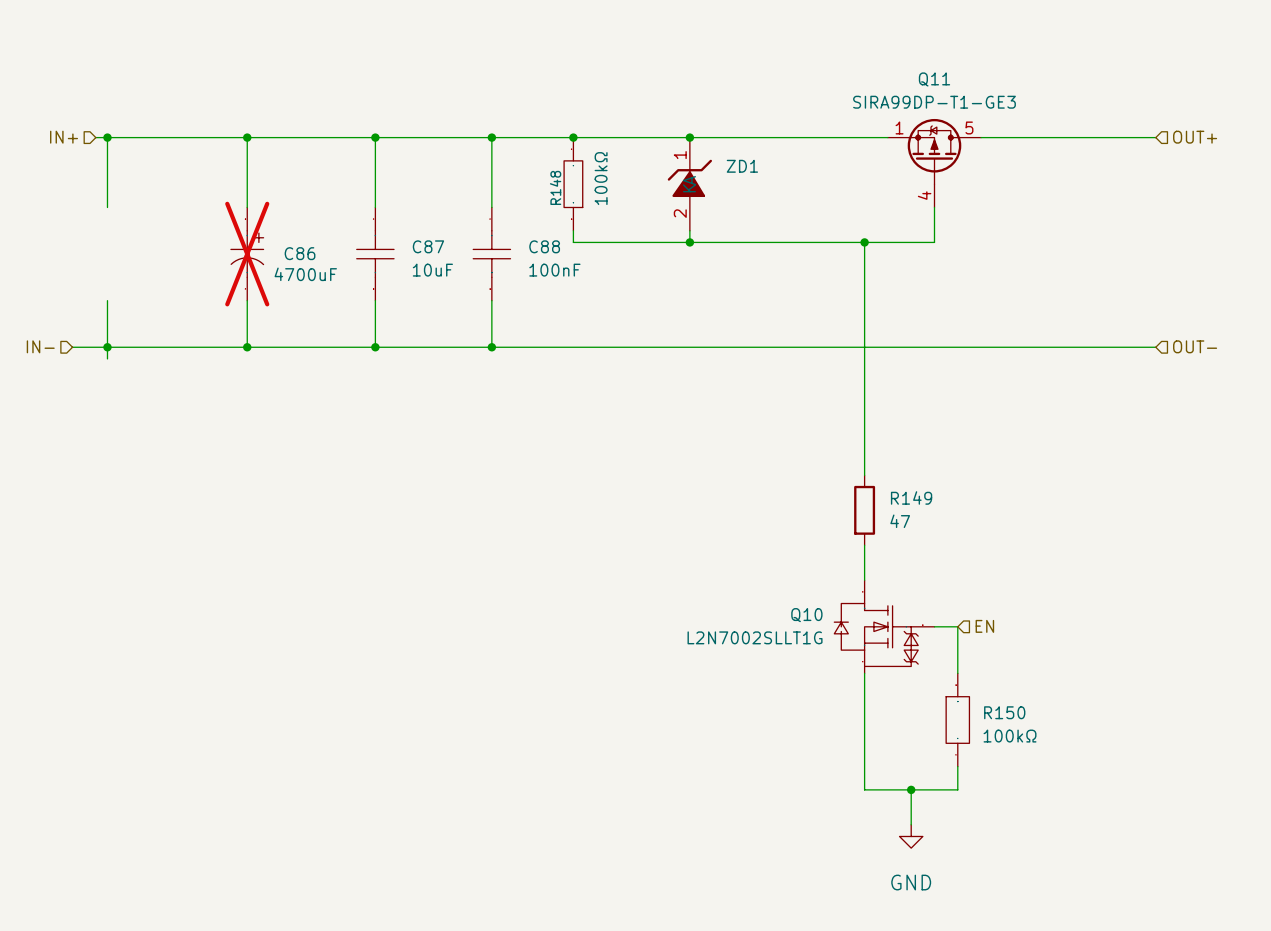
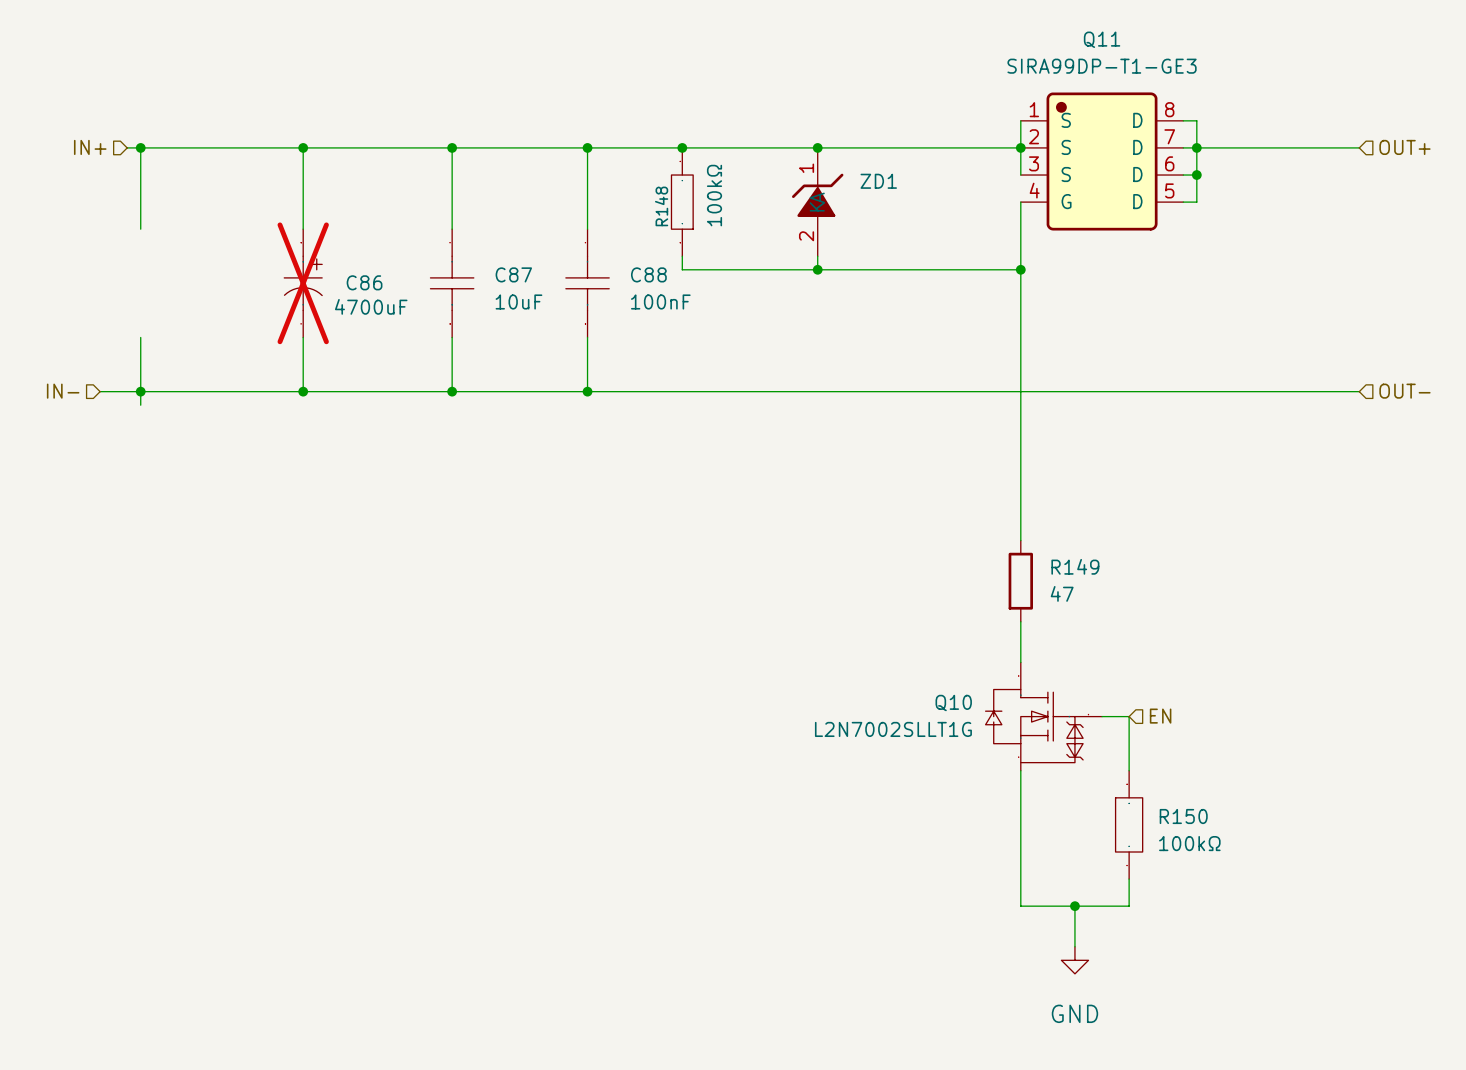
Q11 name position: Q11 (934, 79) -> Q11 (1102, 39)
Q11 value position: SIRA99DP-T1-GE3 (934, 102) -> SIRA99DP-T1-GE3 (1102, 66)
wire: none -> (1020, 120) (1020, 175)
wire: none -> (1183, 120) (1196, 120) (1196, 202) (1183, 202)
Q11 symbol: [887, 118, 982, 208] -> [1020, 92, 1184, 231]
junction: none -> (1020, 147)
junction: none -> (1196, 147)
wire: none -> (1183, 175) (1196, 175)
junction: none -> (1196, 175)
wire: (934, 207) (934, 242) (864, 242) -> (1020, 202) (1020, 269)

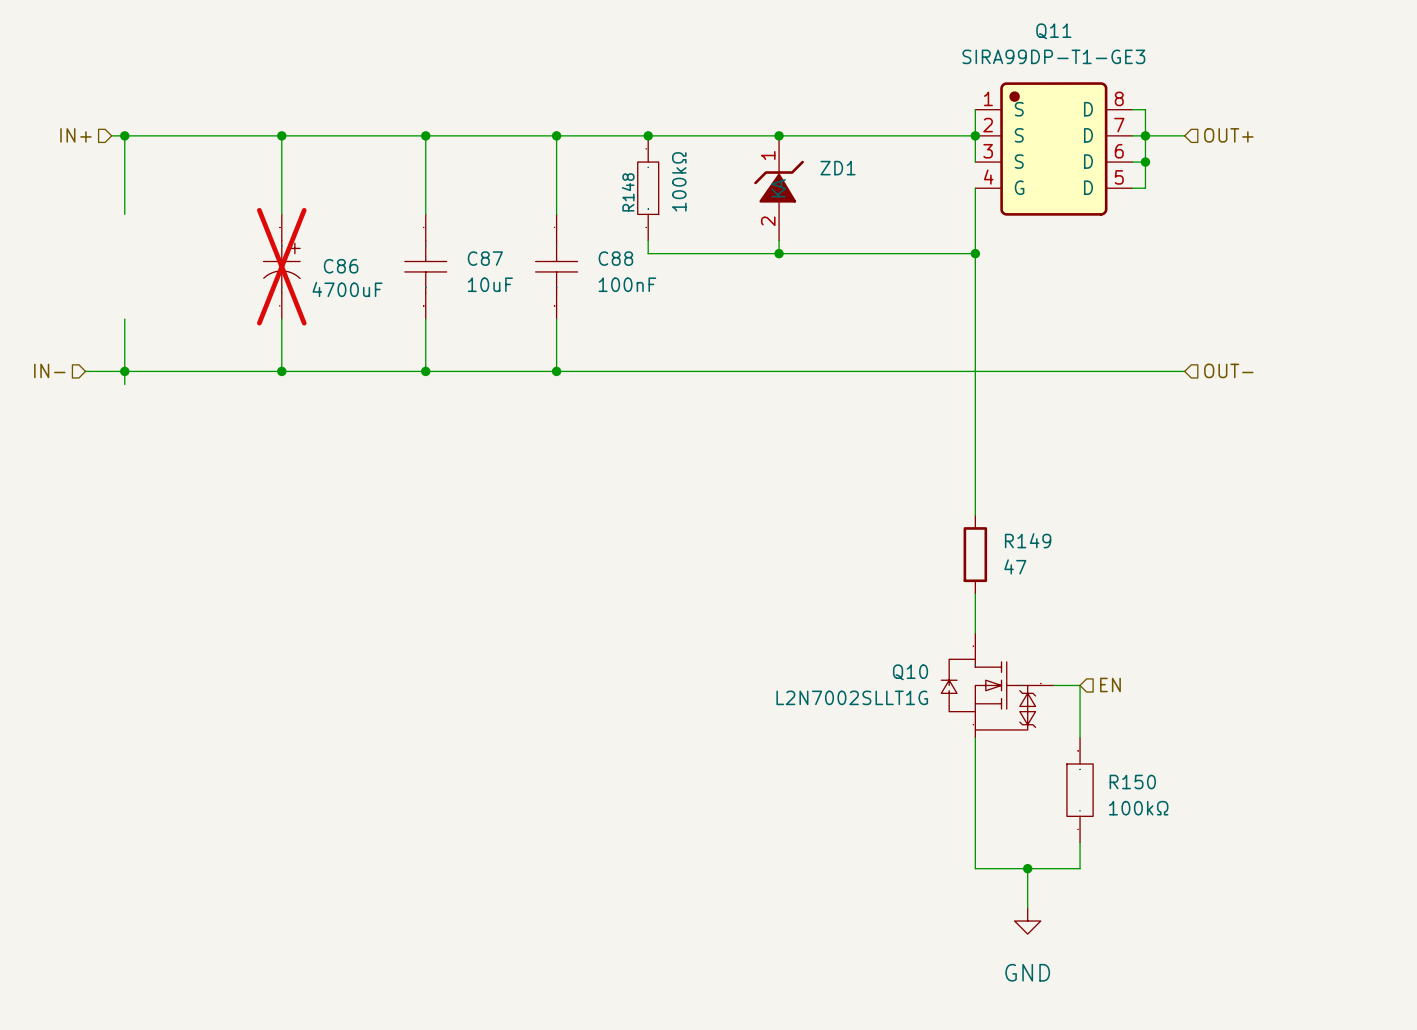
wire: (1237, 147) (1359, 147) -> none
hierarchical label position: OUT+ (1404, 147) -> OUT+ (1228, 135)
wire: (1237, 391) (1359, 391) -> none
hierarchical label position: OUT- (1404, 391) -> OUT- (1228, 370)

